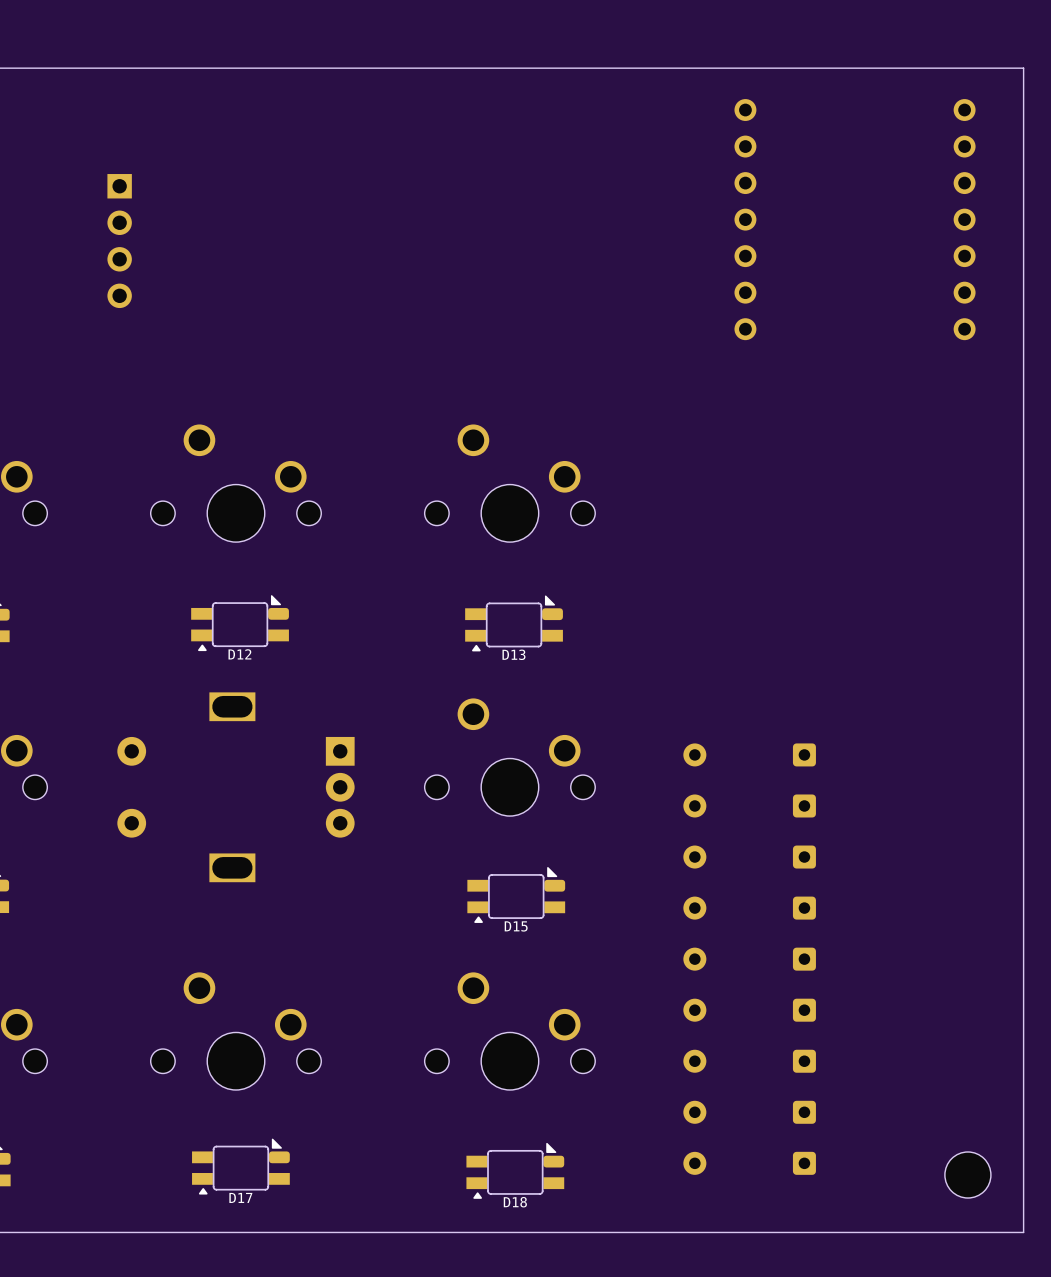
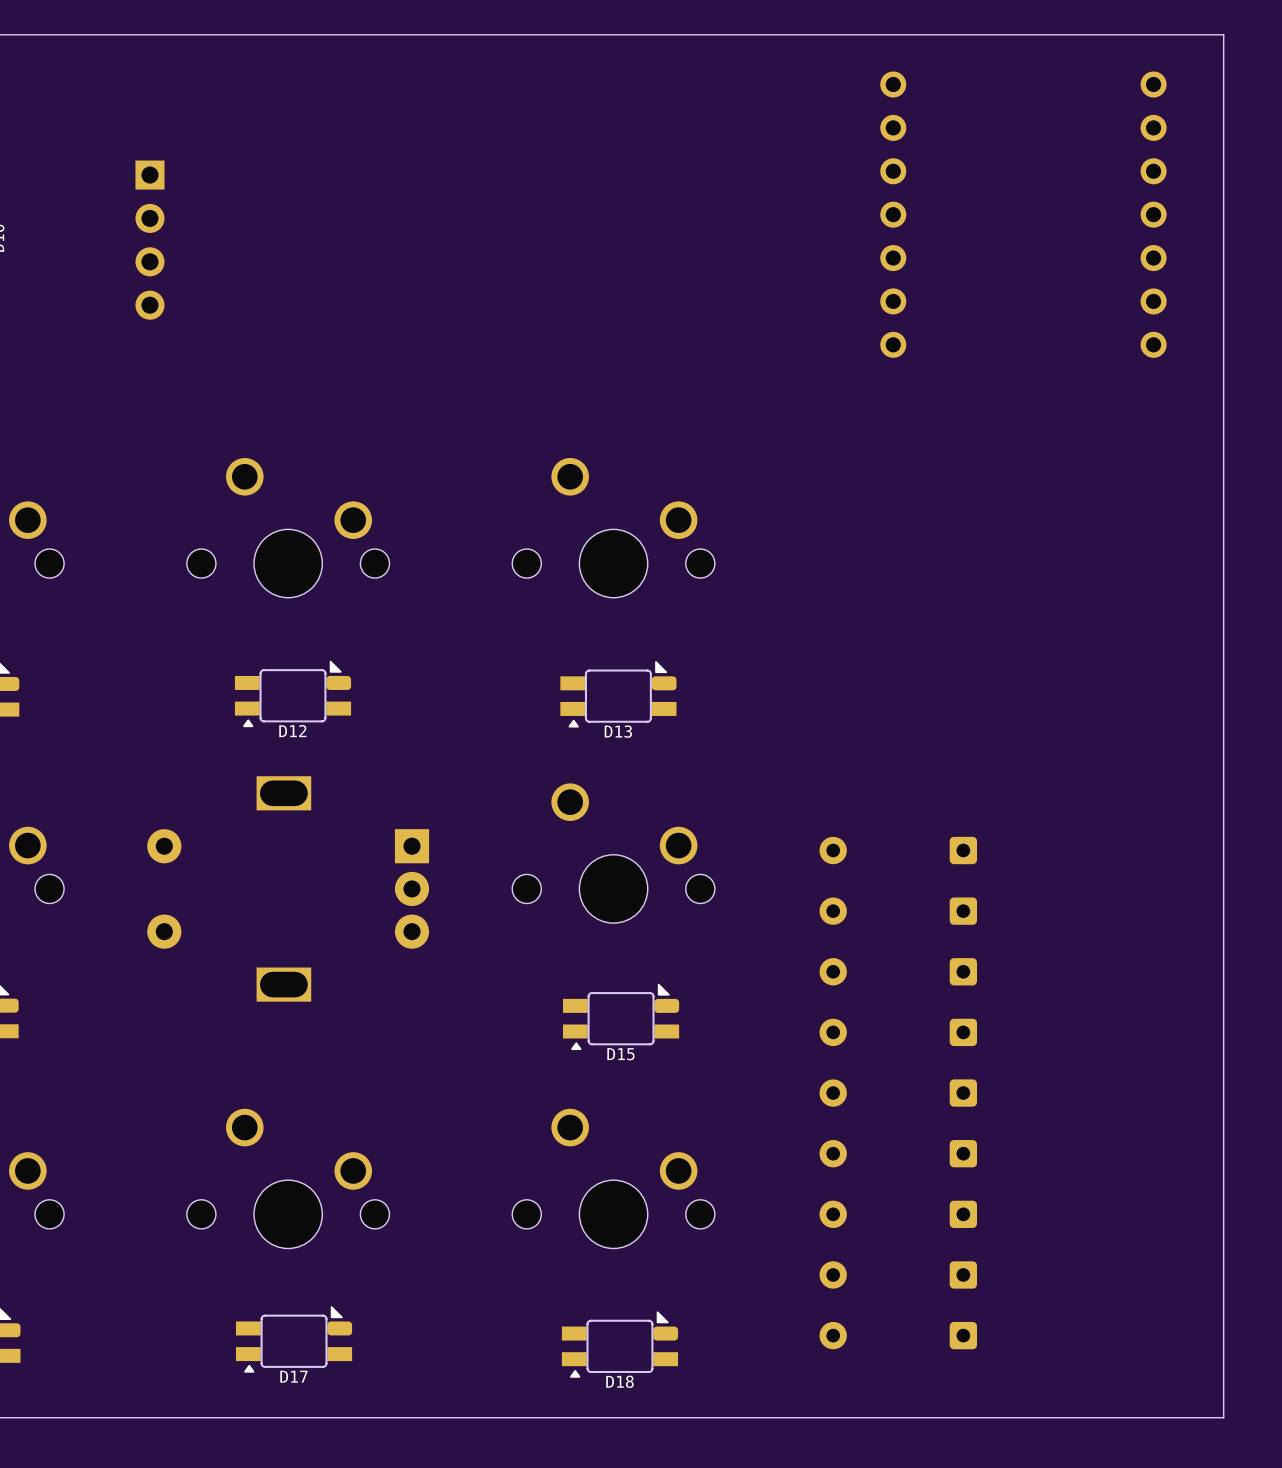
part: (967, 1175) -> none

